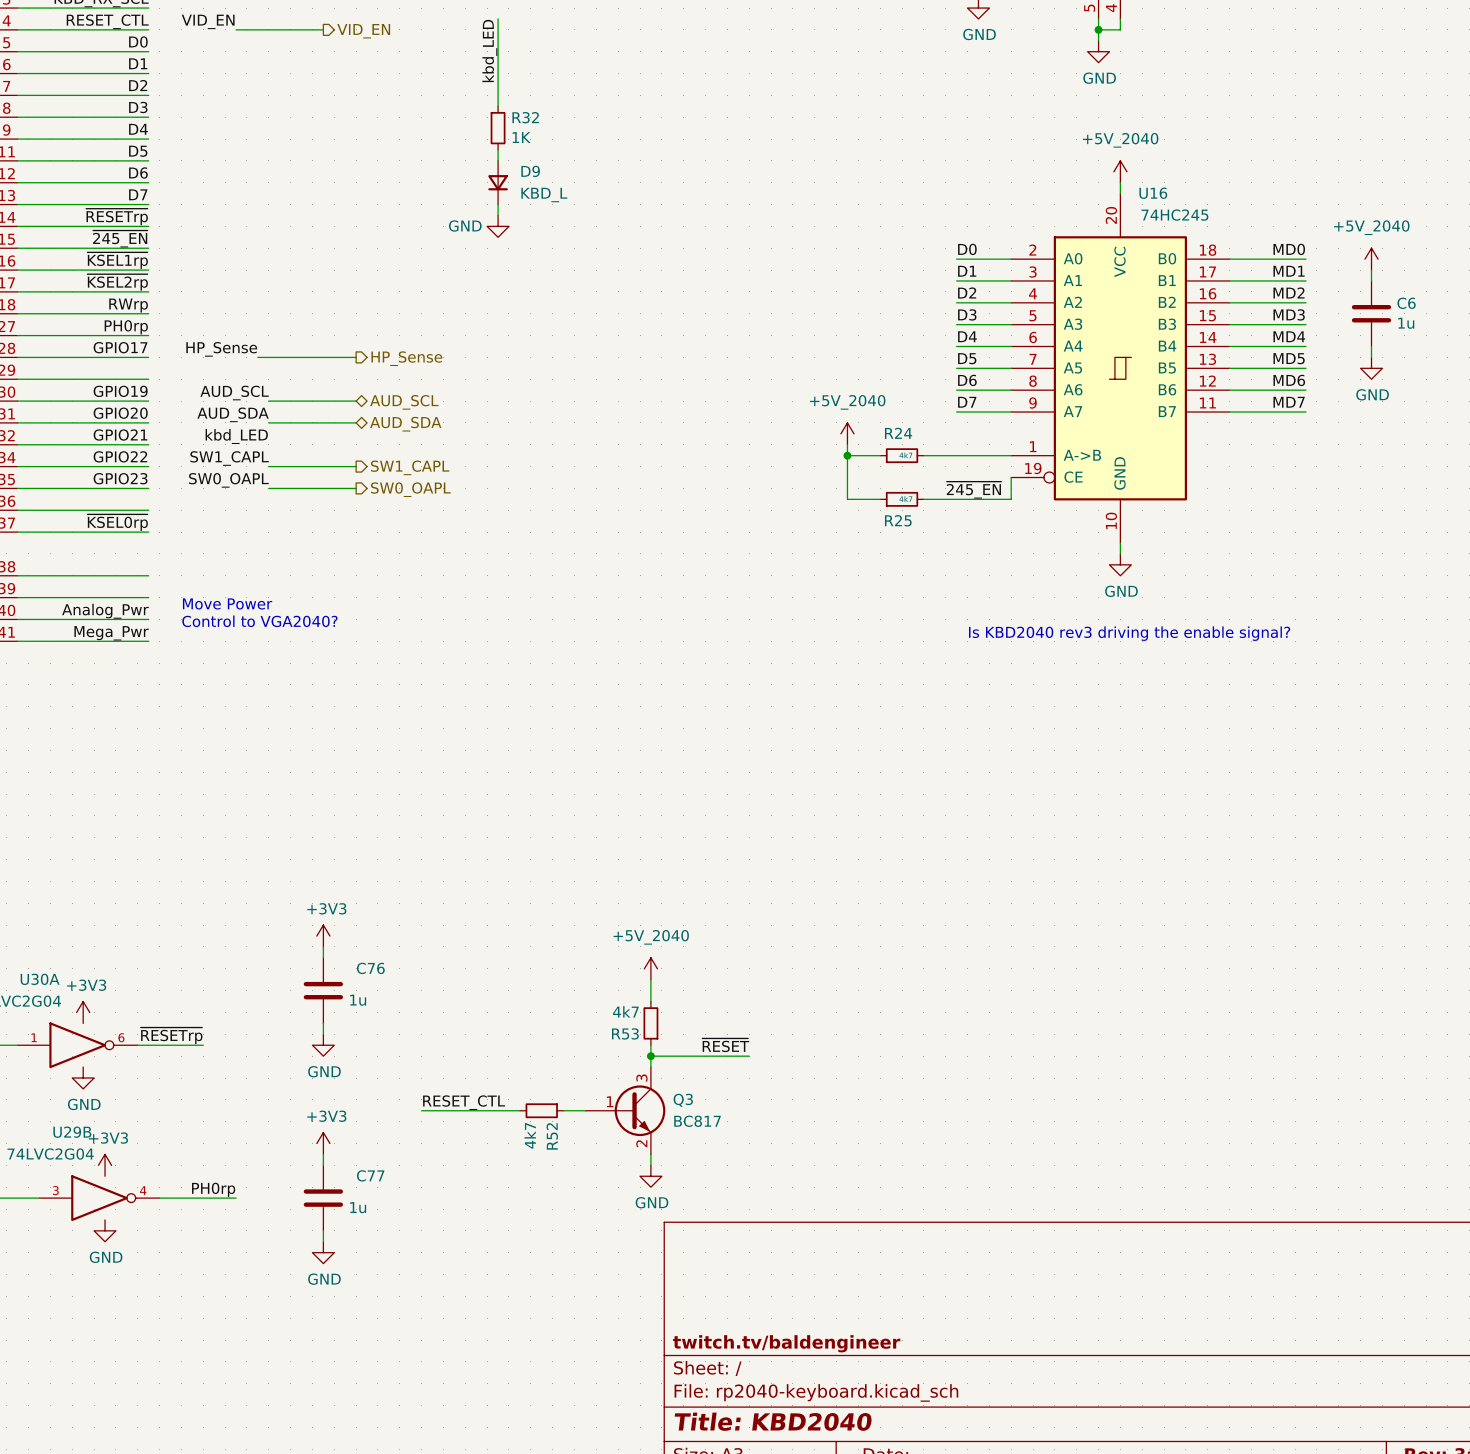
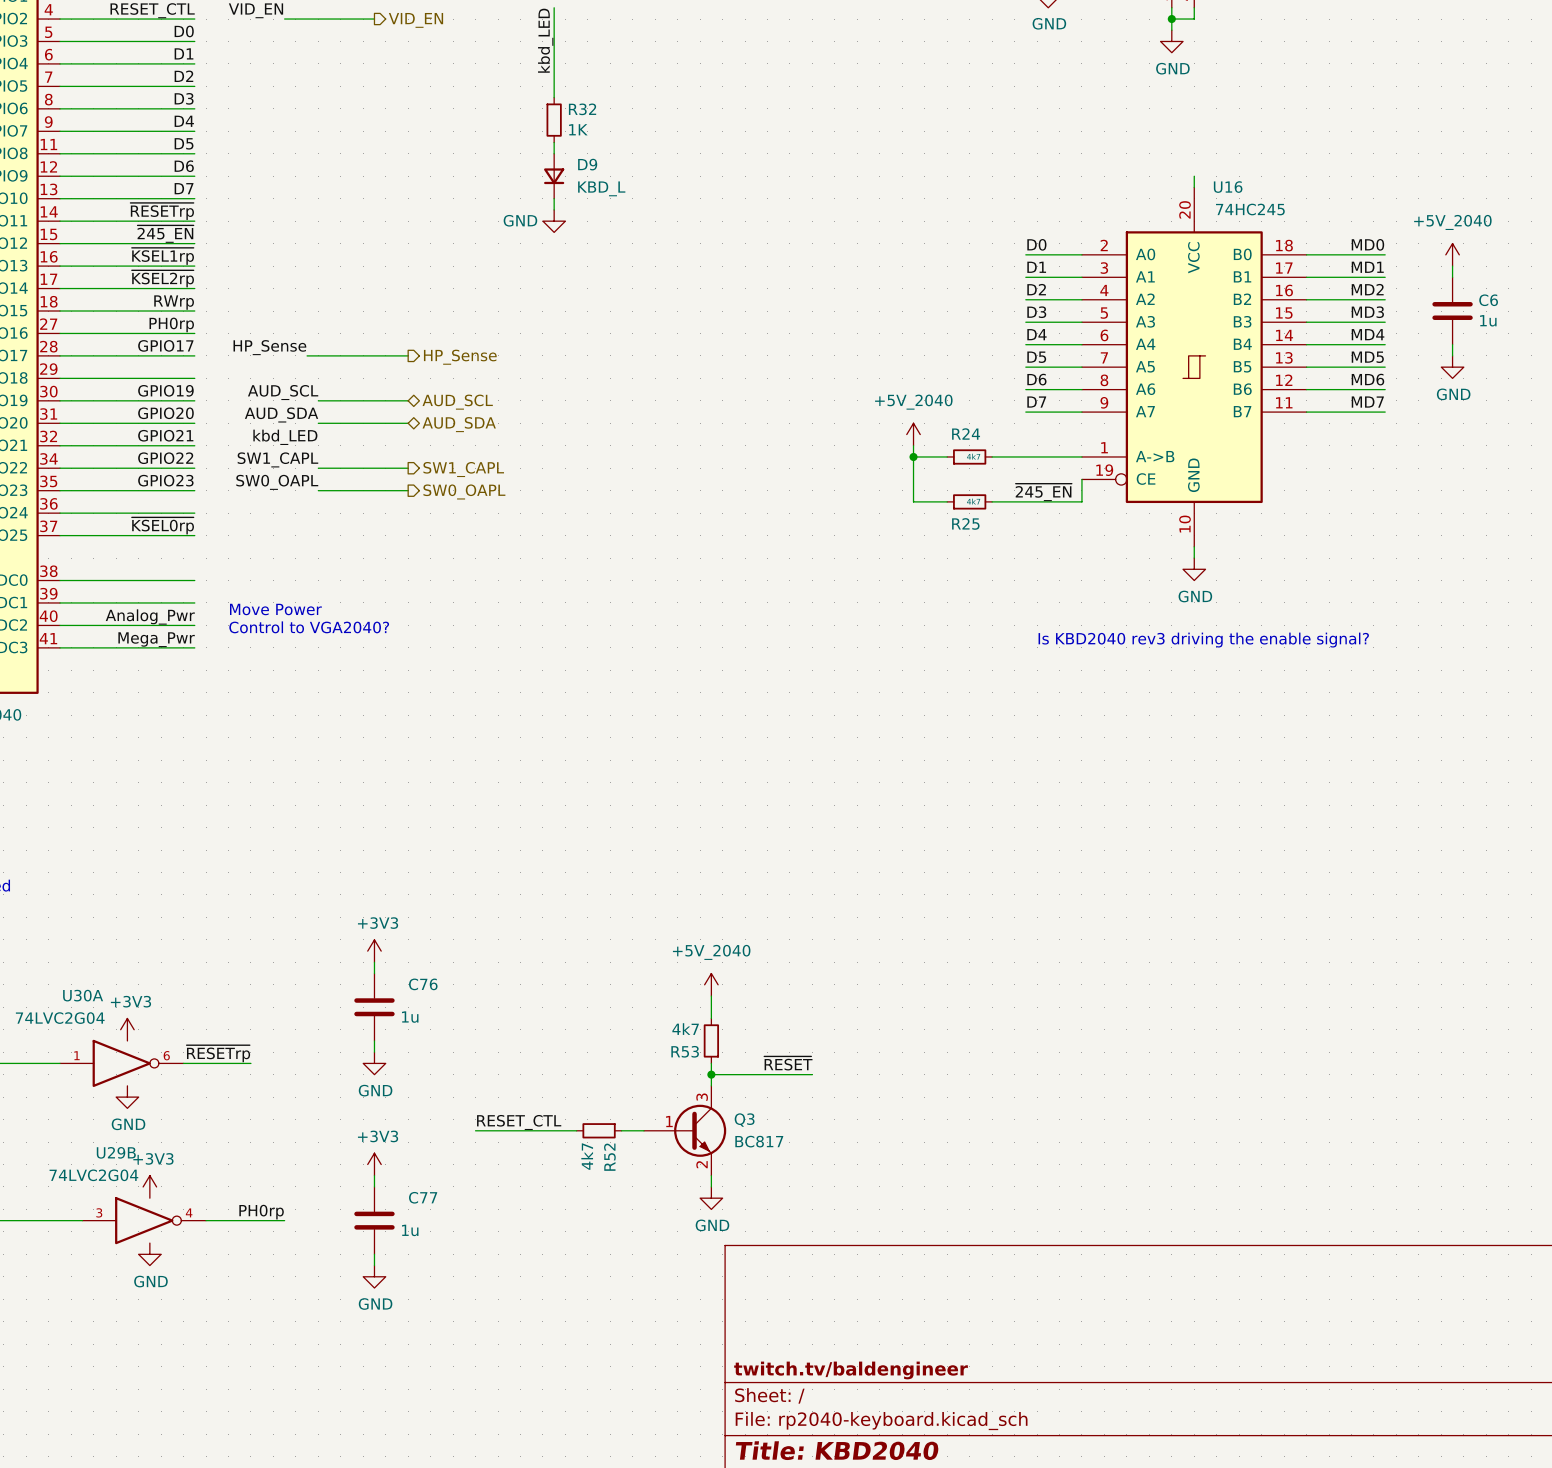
power symbol: +5V_2040 (1120, 171) -> none

